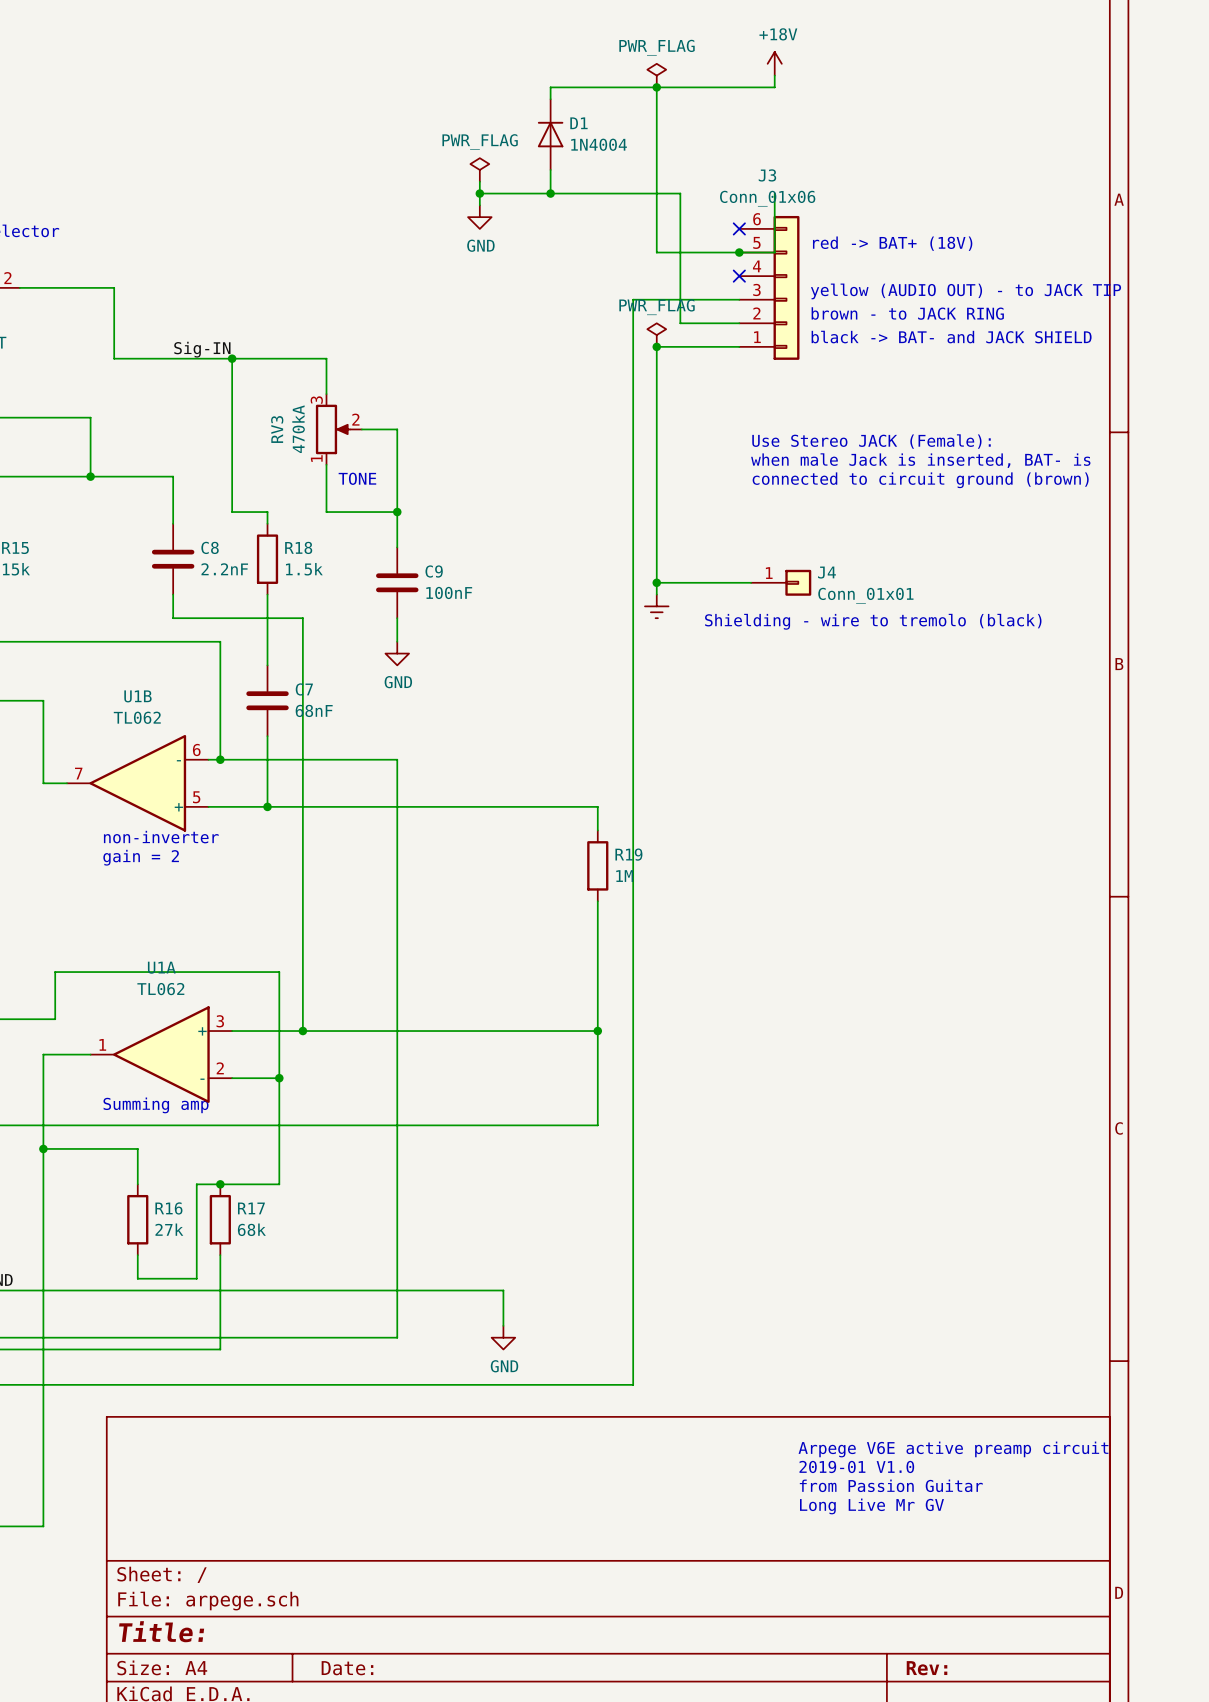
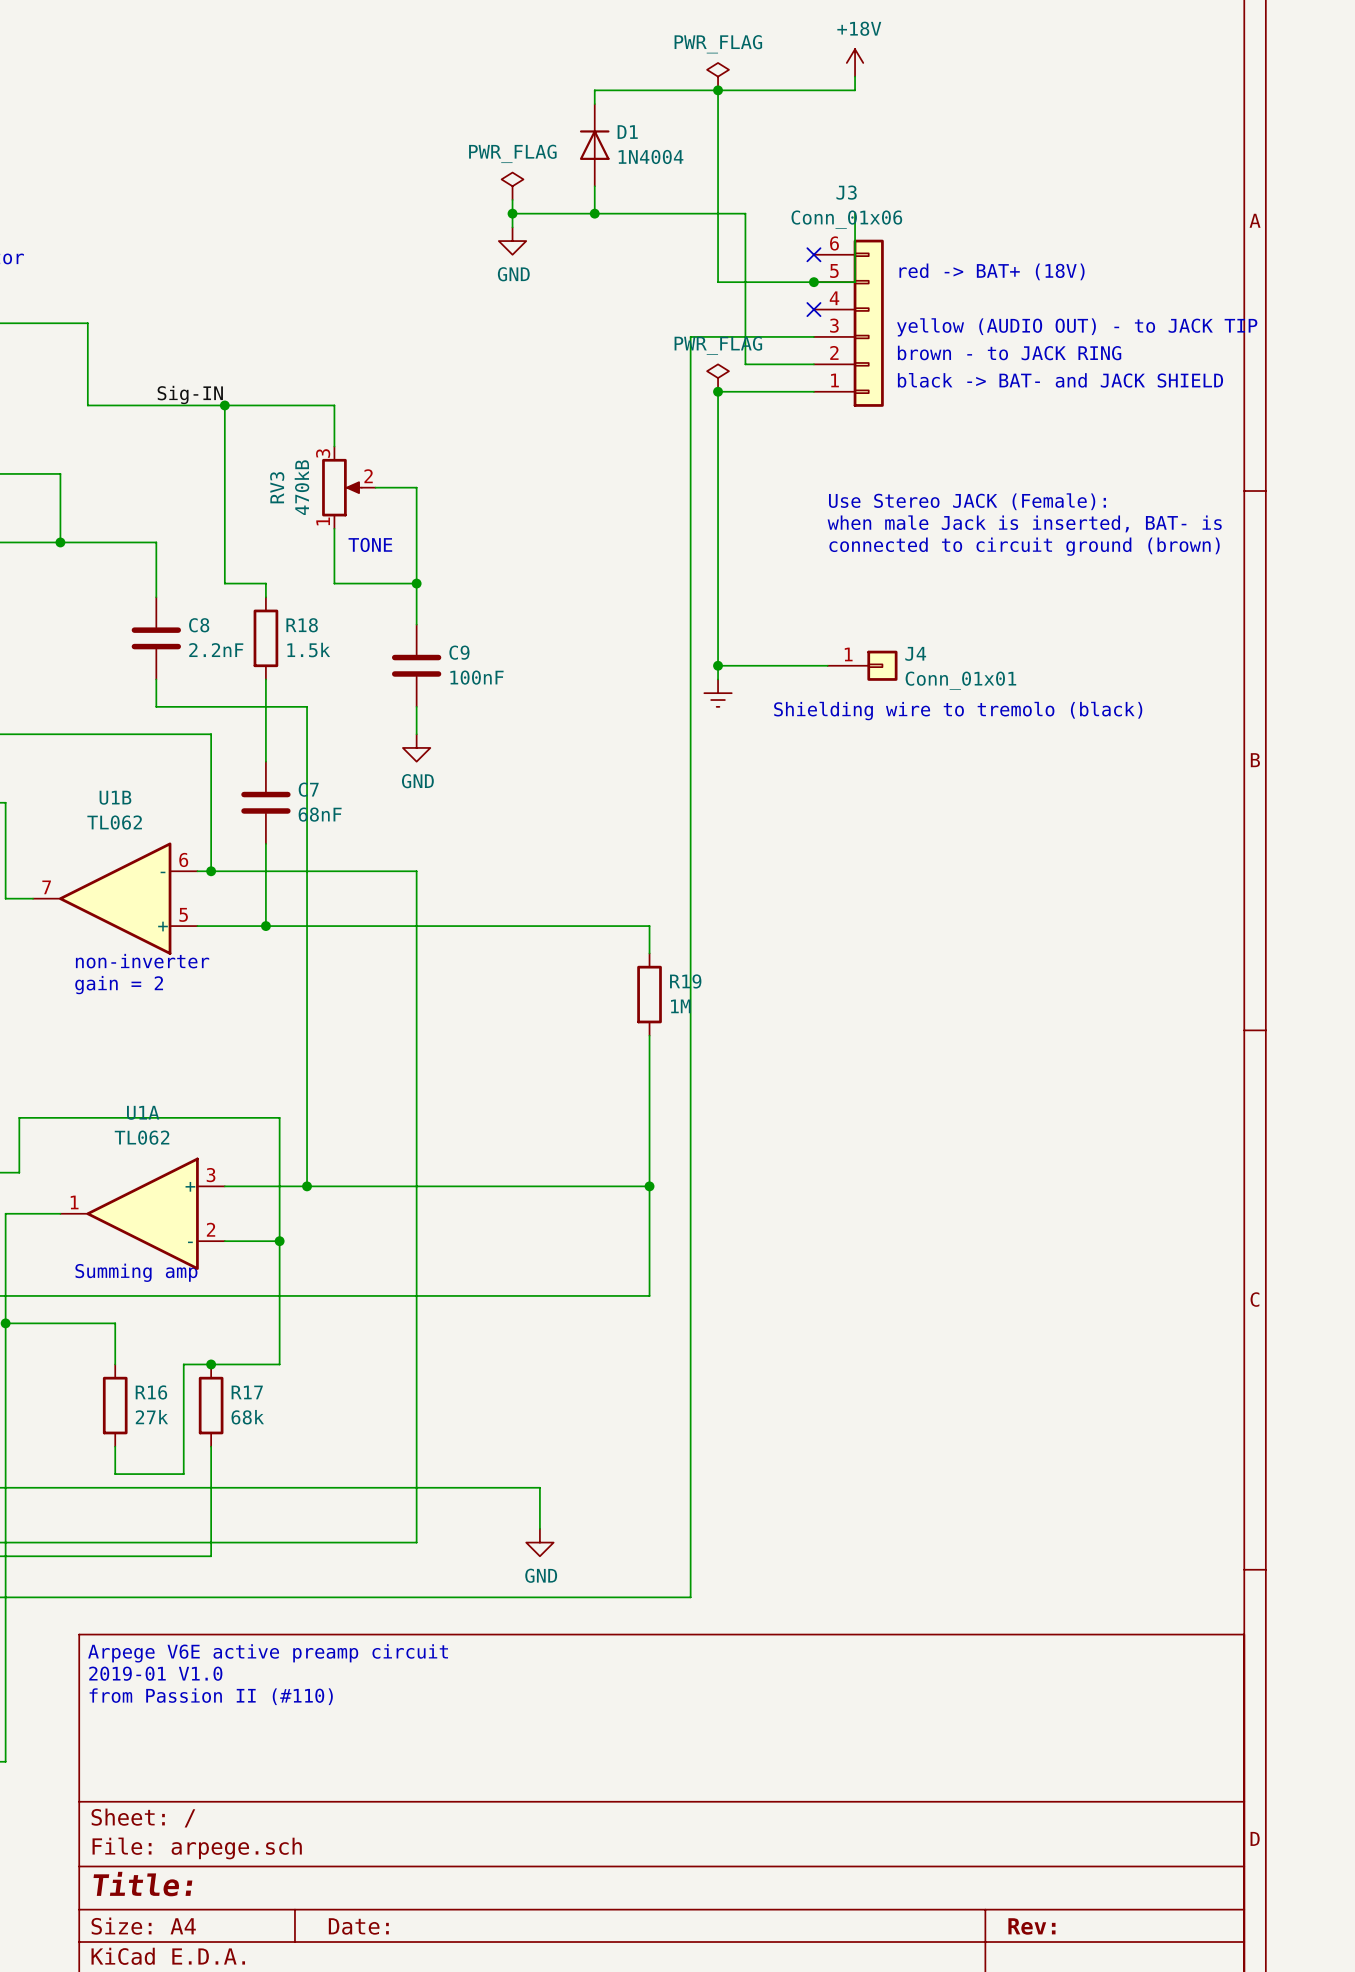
RV3 value: 470kA (298, 429) -> 470kB (301, 487)
text: Shielding - wire to tremolo (black) (873, 621) -> Shielding wire to tremolo (black) (958, 711)
text: none -> Arpege V6E active preamp circuit (268, 1653)
text: Arpege V6E active preamp circuit (953, 1449) -> none
text: none -> 2019-01 V1.0 (155, 1673)
text: 2019-01 V1.0 (856, 1466) -> none
text: none -> from Passion II (#110) (211, 1696)
text: from Passion Guitar (891, 1485) -> none
text: Long Live Mr GV (871, 1506) -> none

